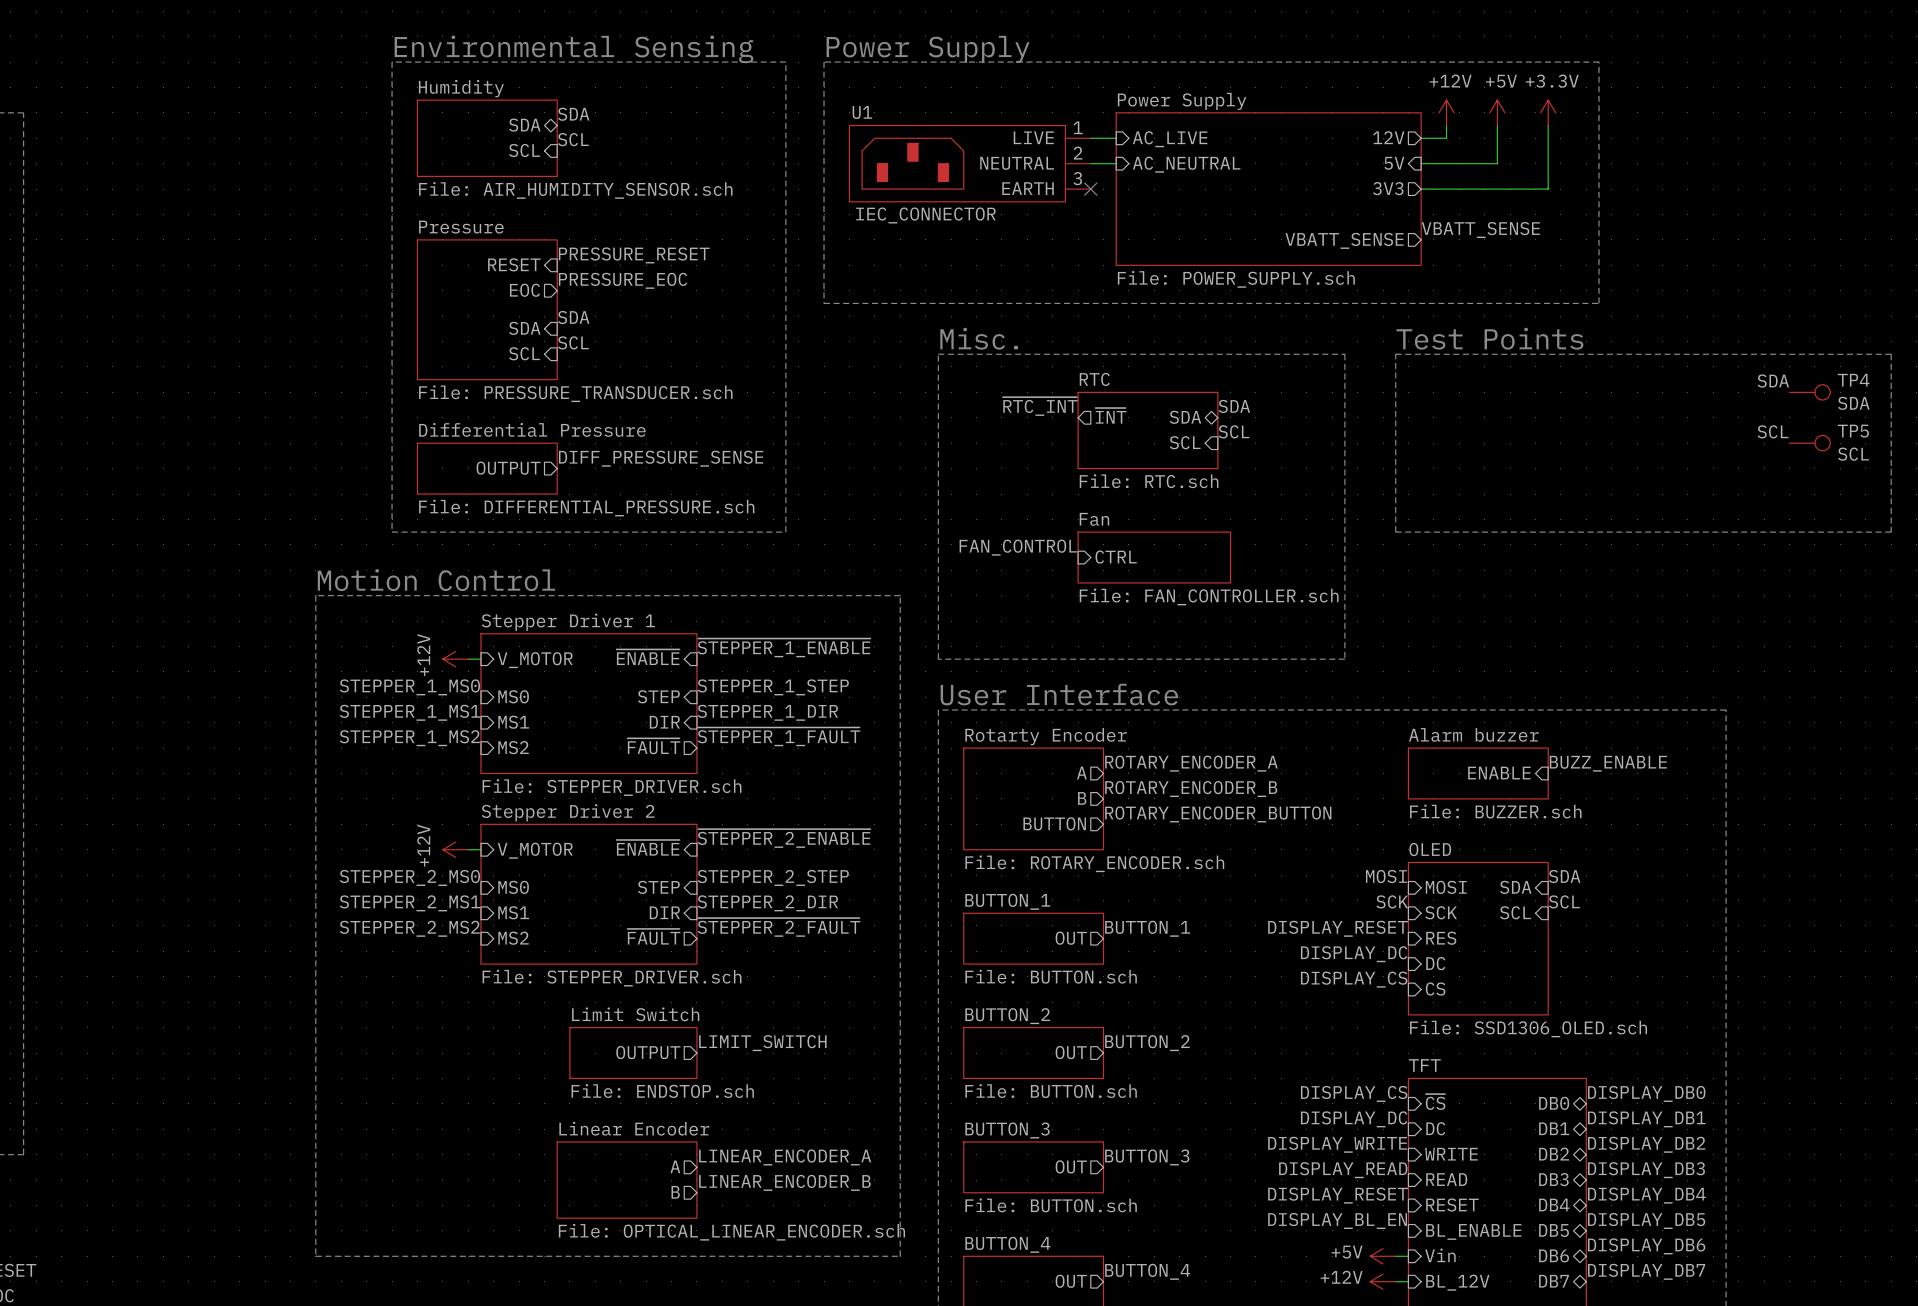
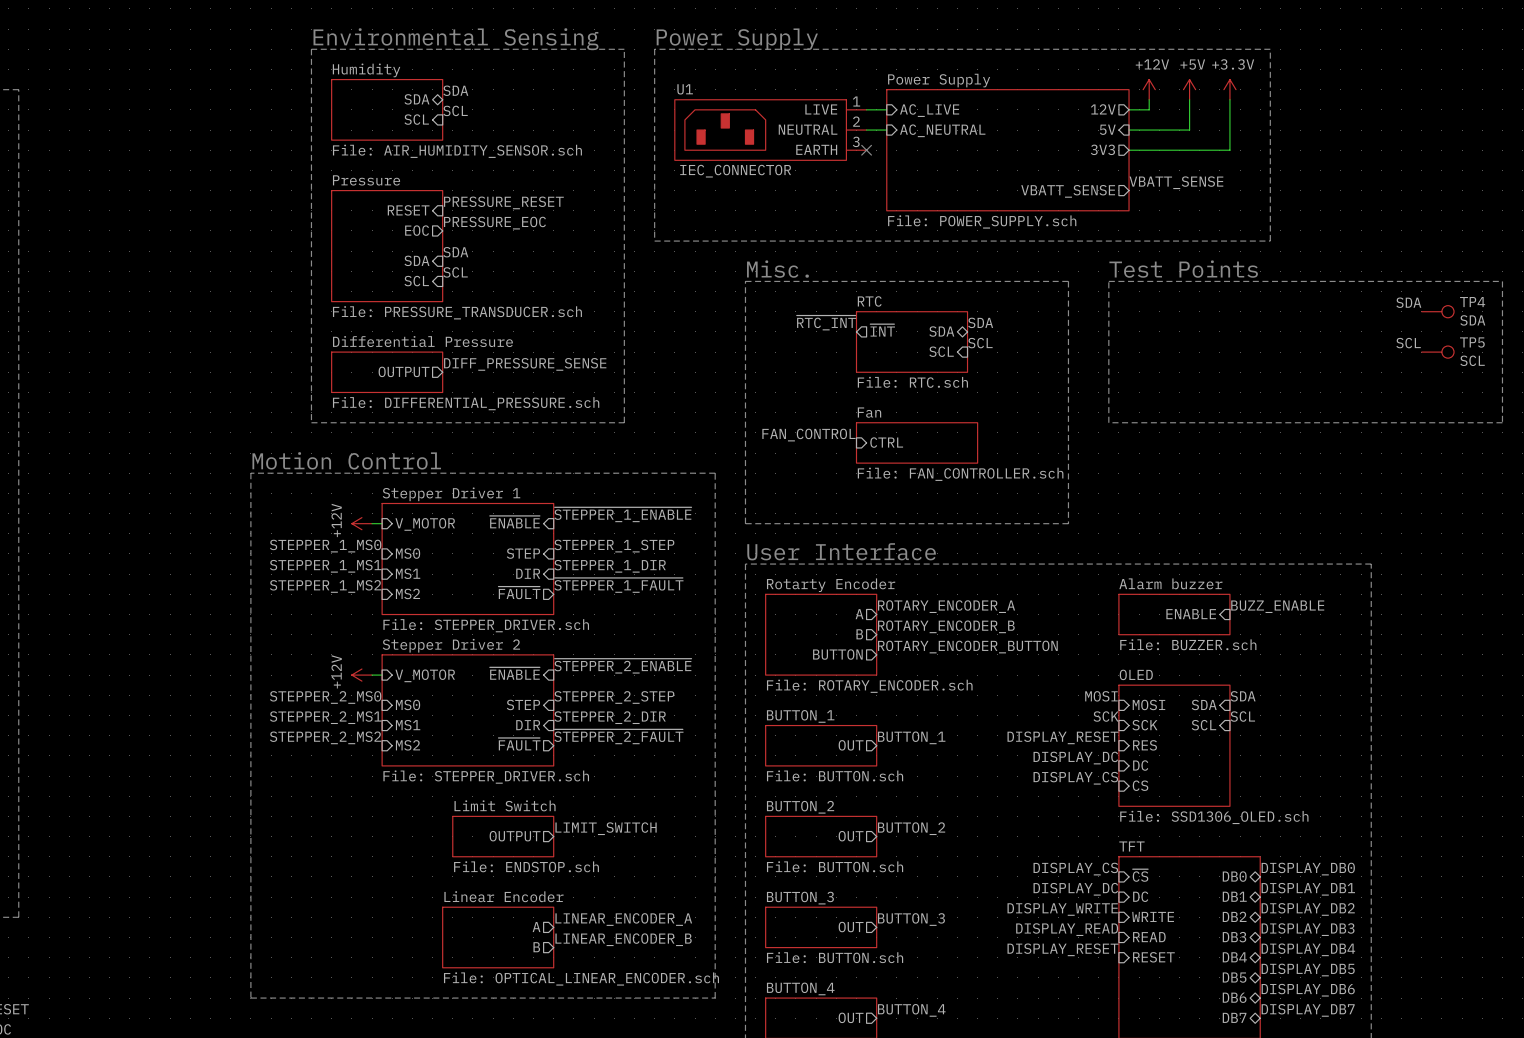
label: DISPLAY_BL_EN (1337, 1220) -> none
sheet pin: BL_ENABLE (1473, 1231) -> none
sheet pin: Vin (1440, 1255) -> none
power symbol: +5V (1383, 1256) -> none
wire: (1395, 1256) (1408, 1256) -> none
power symbol: +12V (1383, 1281) -> none
wire: (1395, 1281) (1408, 1281) -> none
sheet pin: BL_12V (1457, 1282) -> none

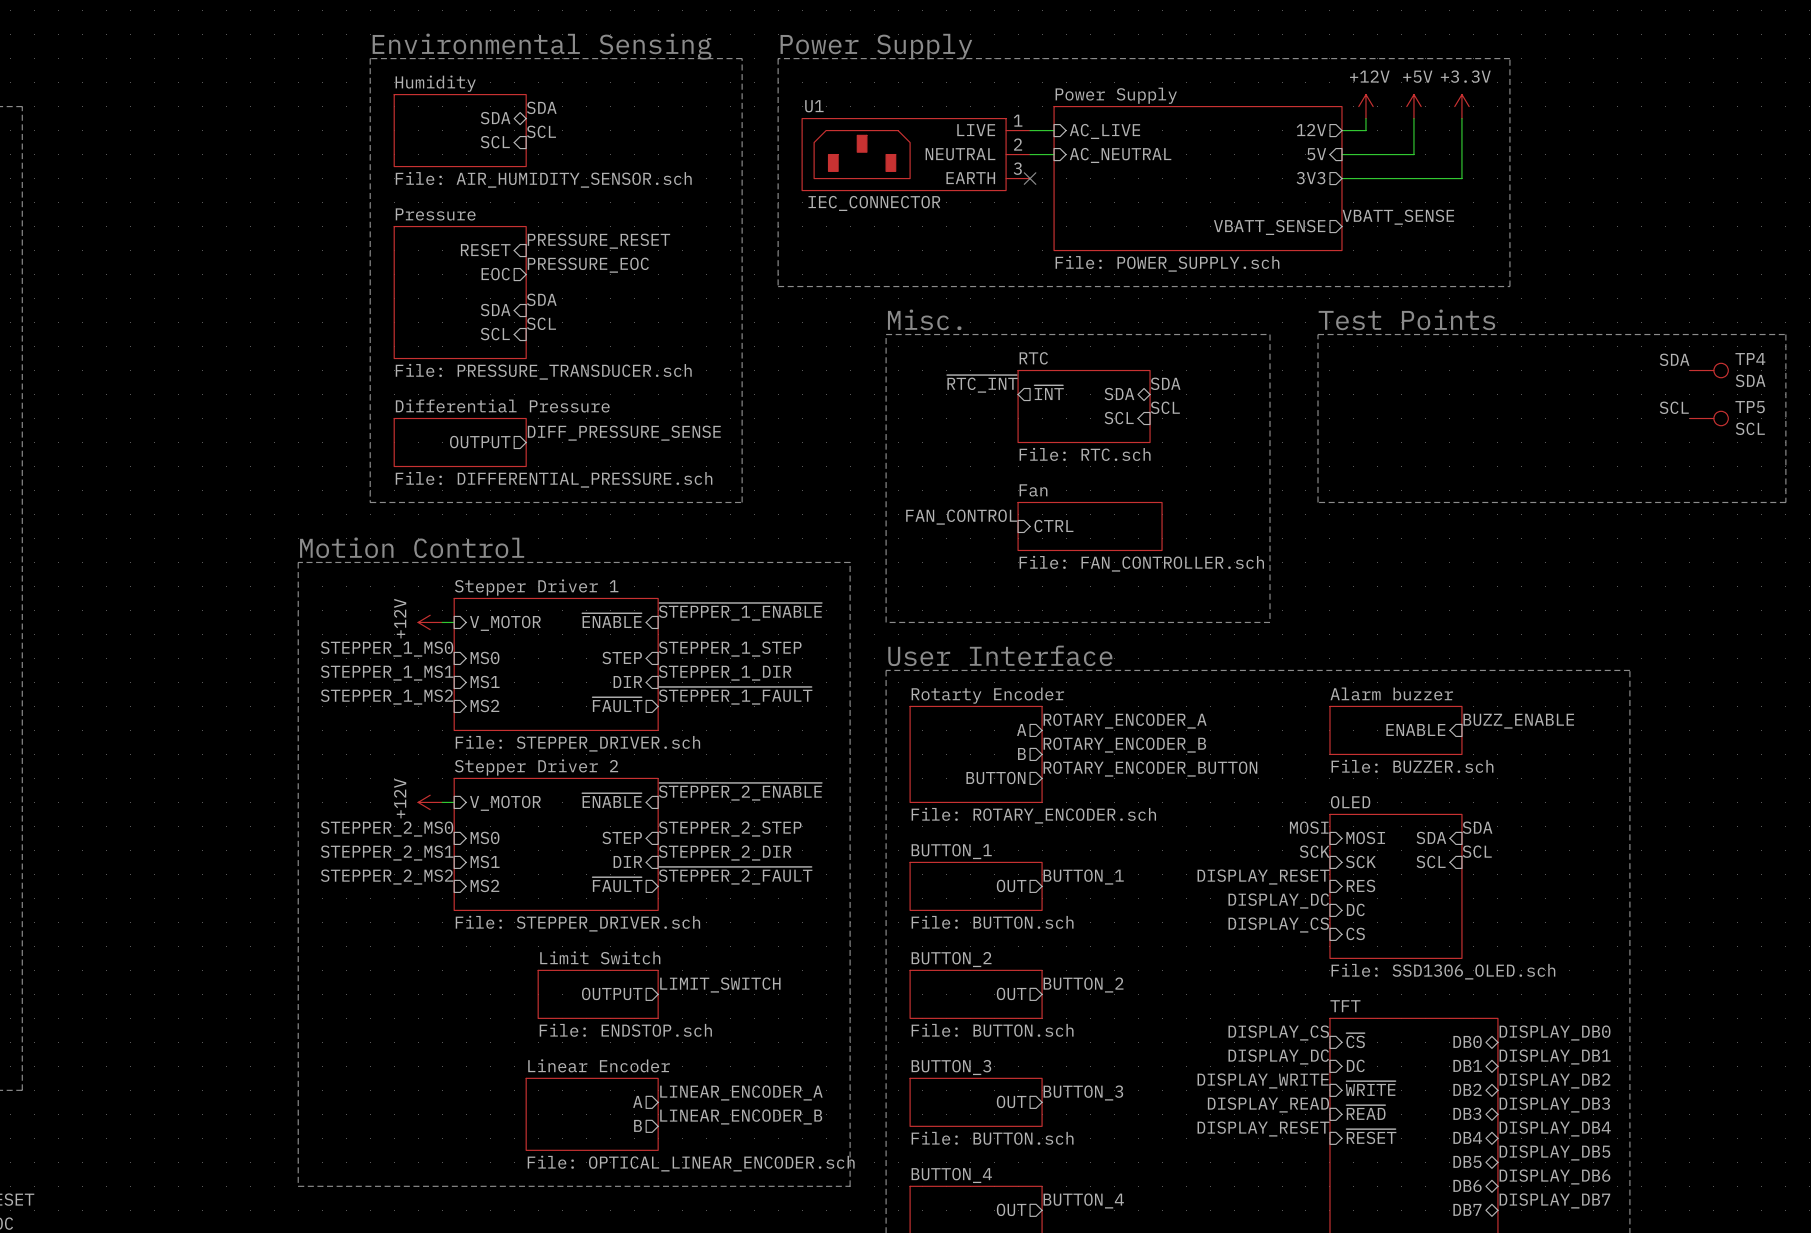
sheet pin: WRITE (1153, 916) -> ~{WRITE} (1370, 1088)
sheet pin: READ (1149, 937) -> ~{READ} (1365, 1112)
sheet pin: RESET (1153, 957) -> ~{RESET} (1371, 1136)

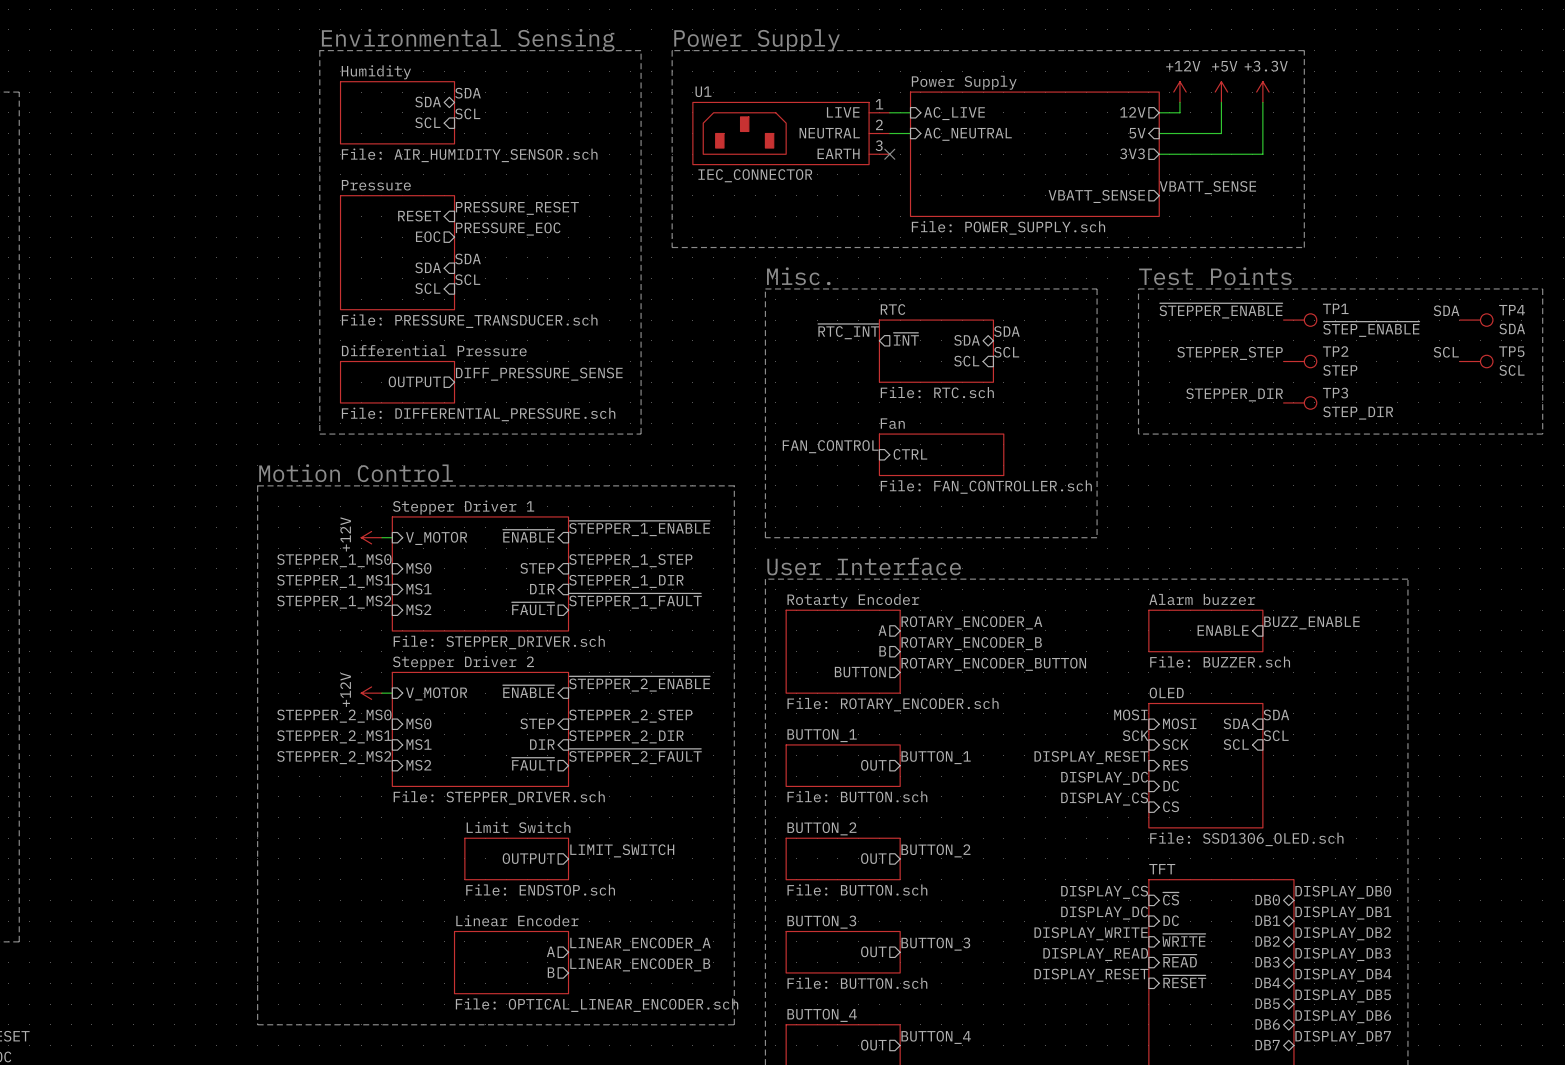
label: none -> ~{STEPPER_ENABLE} (1221, 310)
TP1: none -> ~{STEP_ENABLE} (1300, 320)
label: none -> STEPPER_STEP (1230, 353)
TP2: none -> STEP (1300, 361)
label: none -> STEPPER_DIR (1234, 394)
TP3: none -> STEP_DIR (1300, 402)

